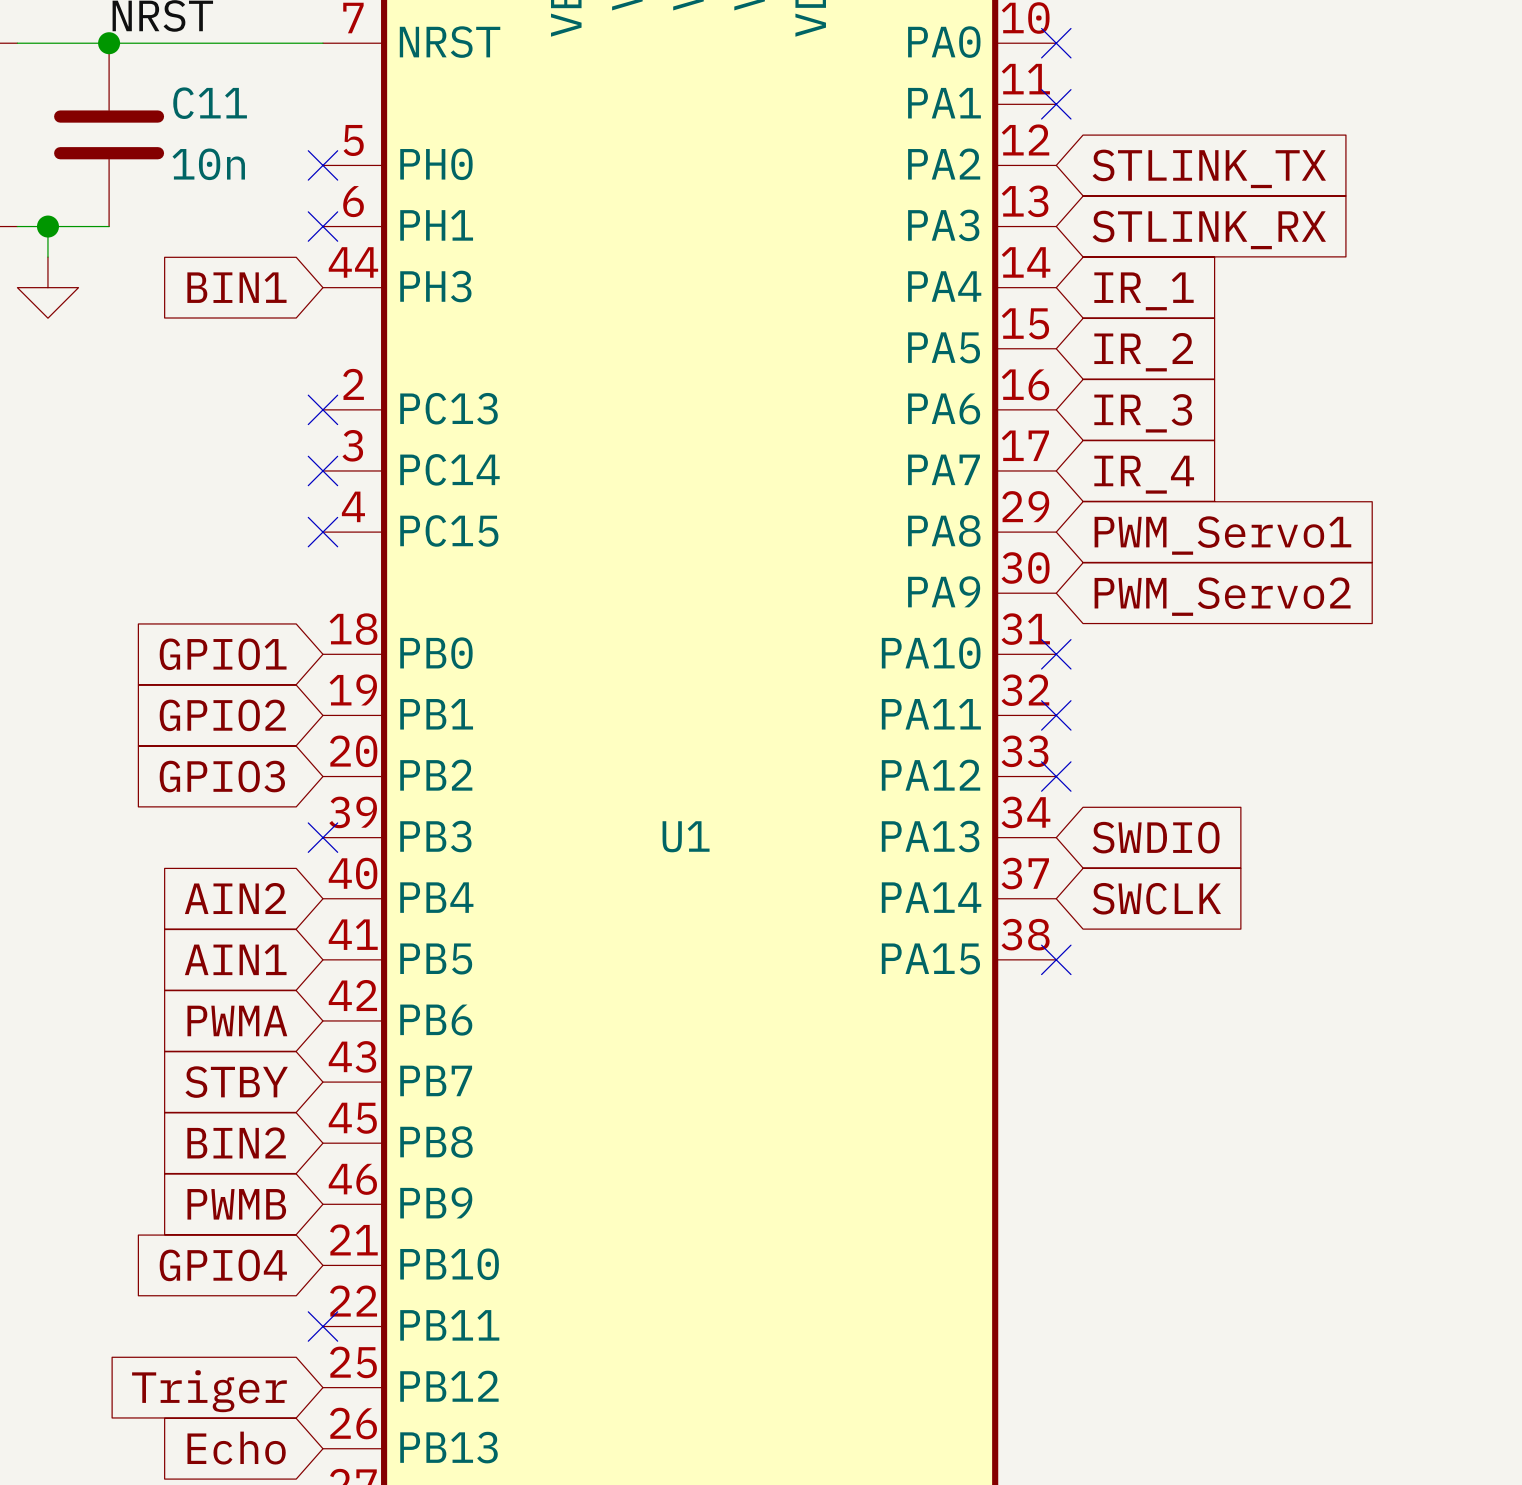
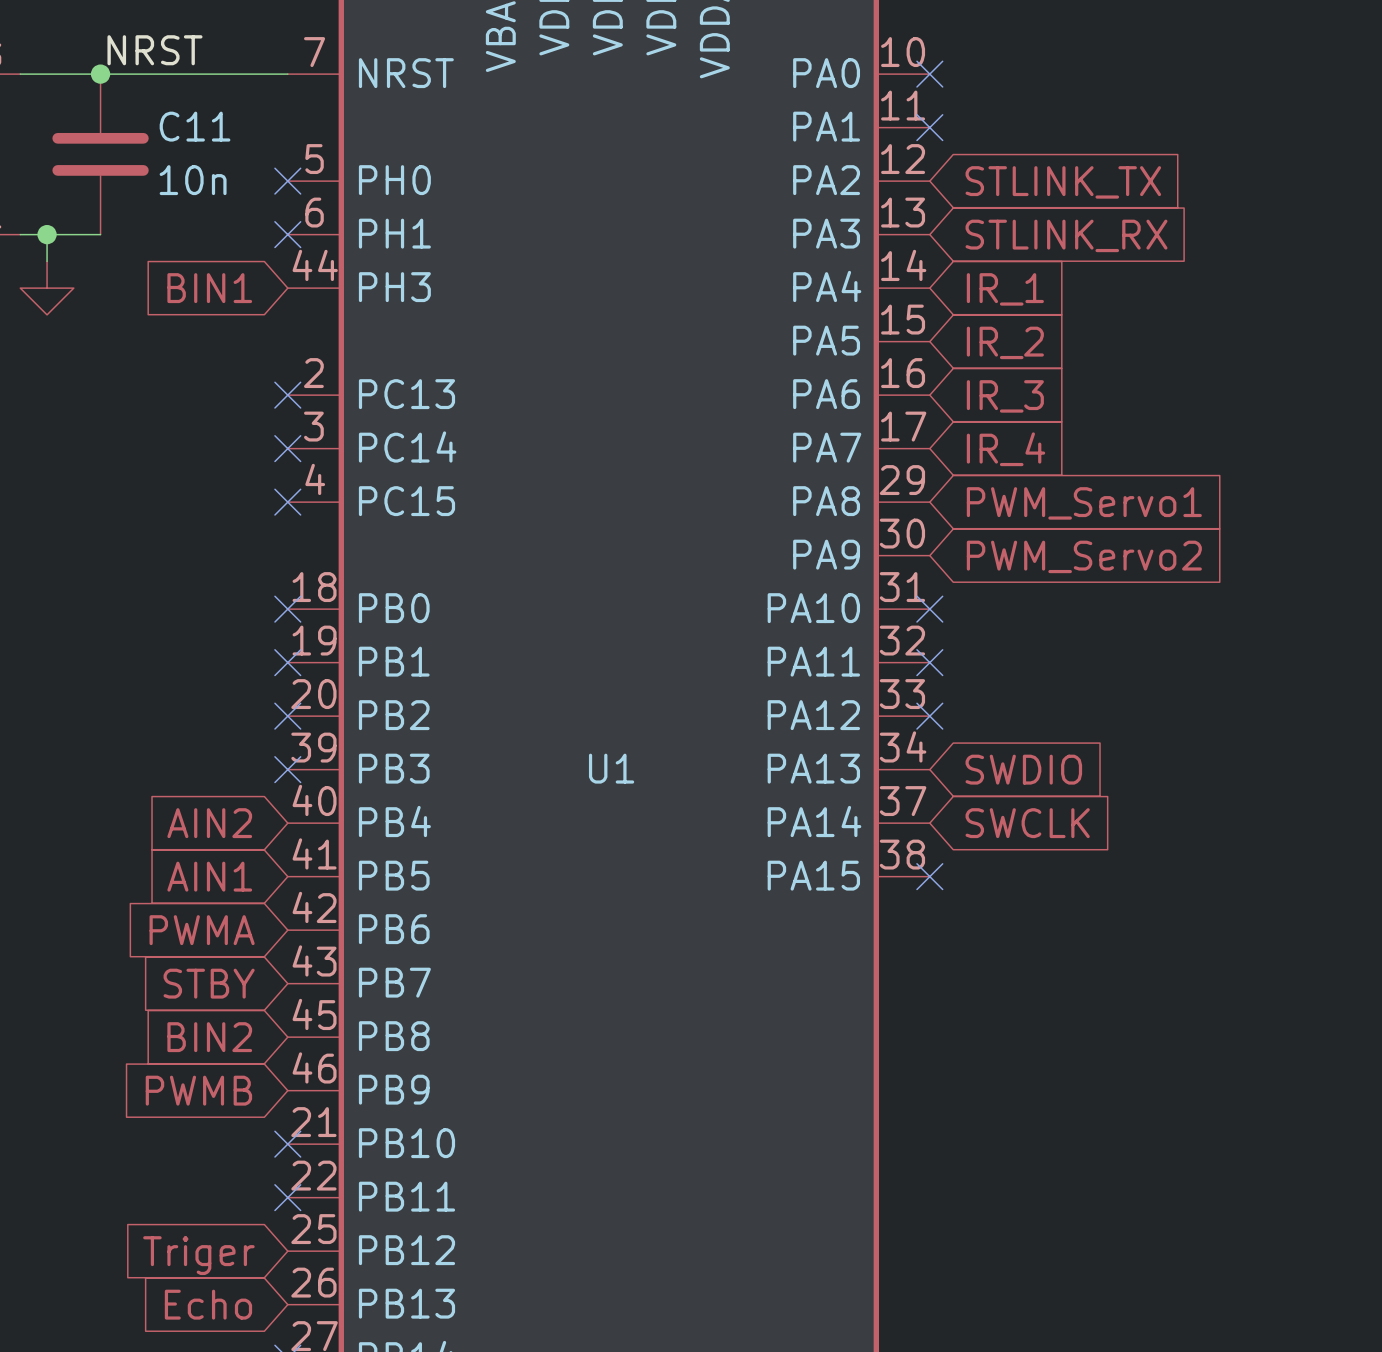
global label: GPIO1 (223, 654) -> none
no-connect mark: none -> (287, 609)
global label: GPIO2 (222, 715) -> none
no-connect mark: none -> (287, 662)
global label: GPIO3 (222, 776) -> none
no-connect mark: none -> (287, 716)
global label: GPIO4 (223, 1265) -> none
no-connect mark: none -> (287, 1144)

